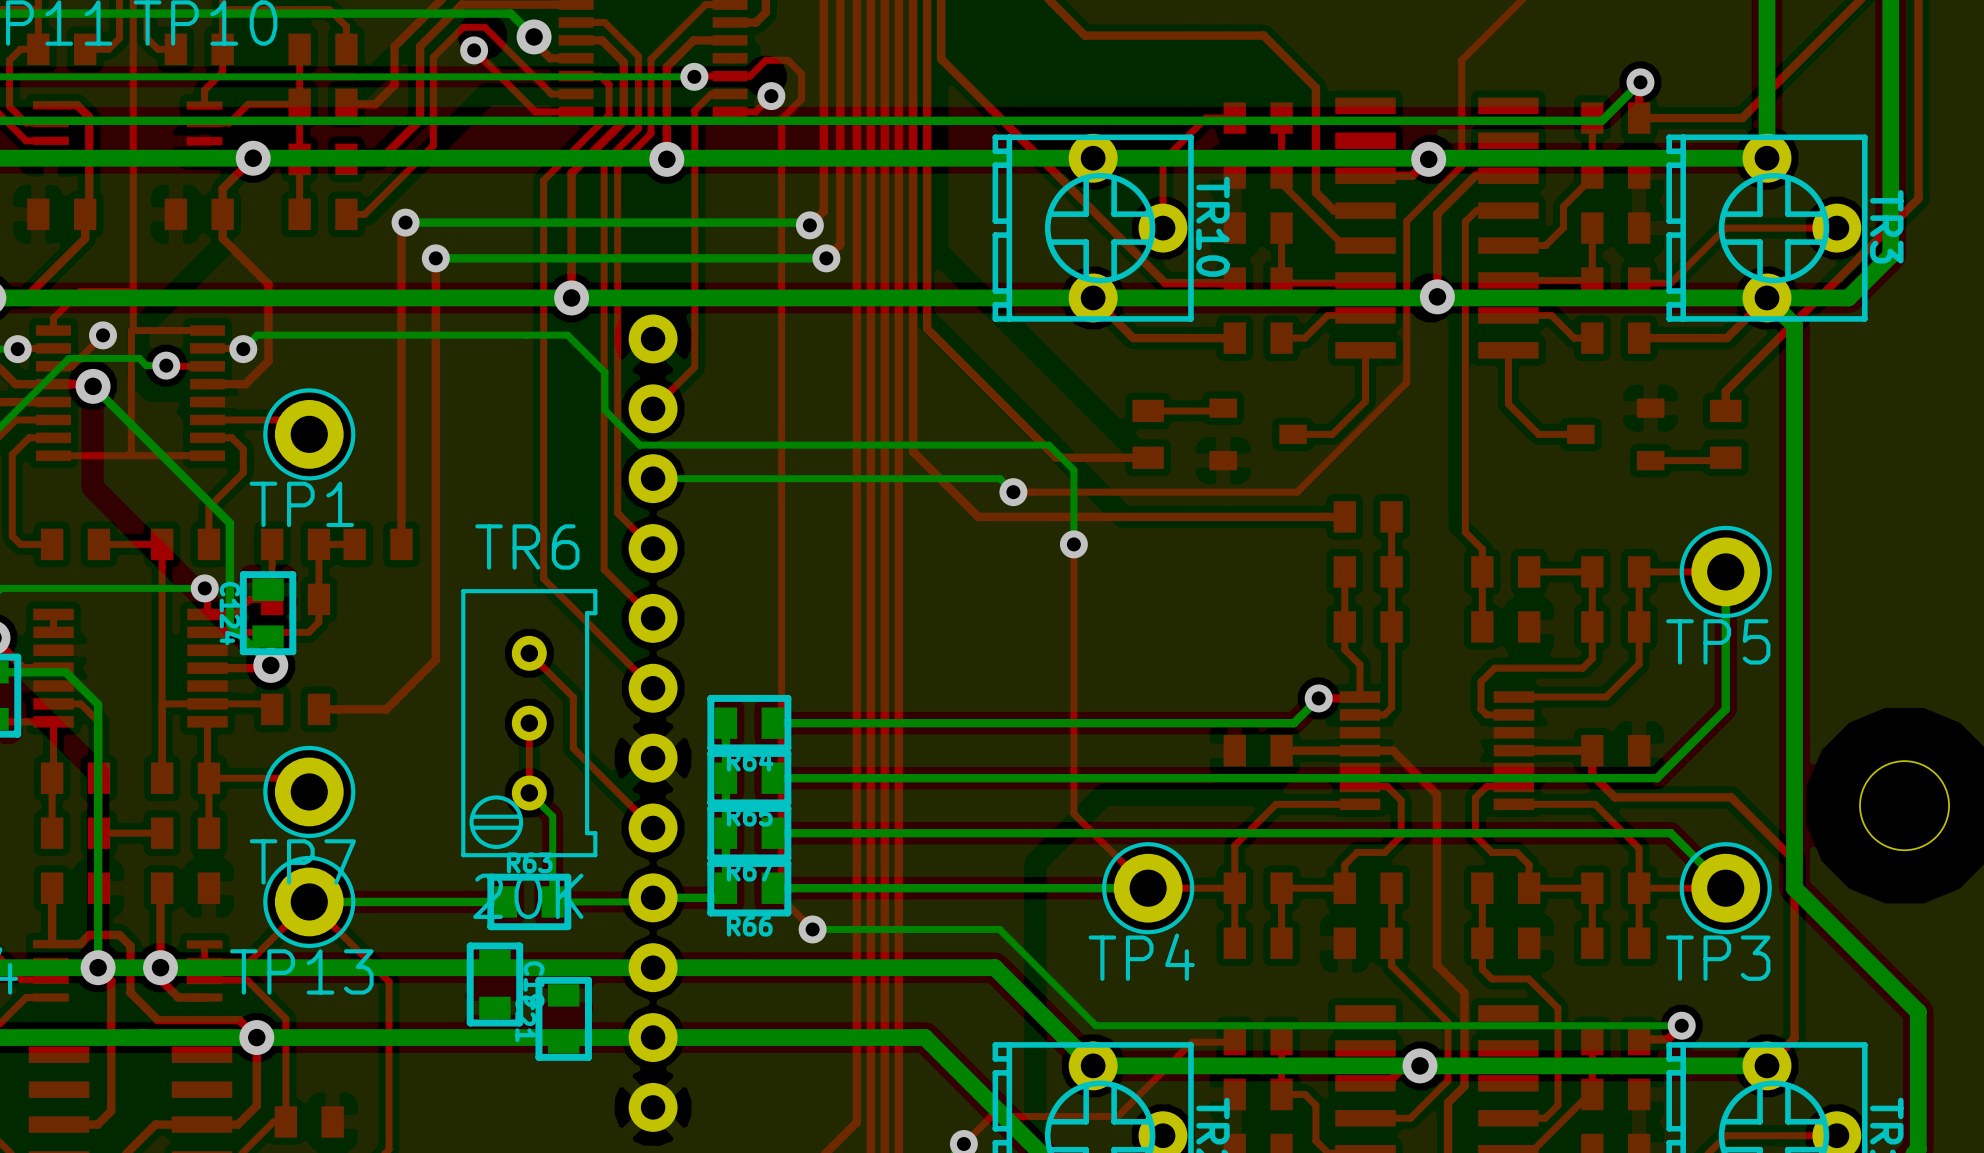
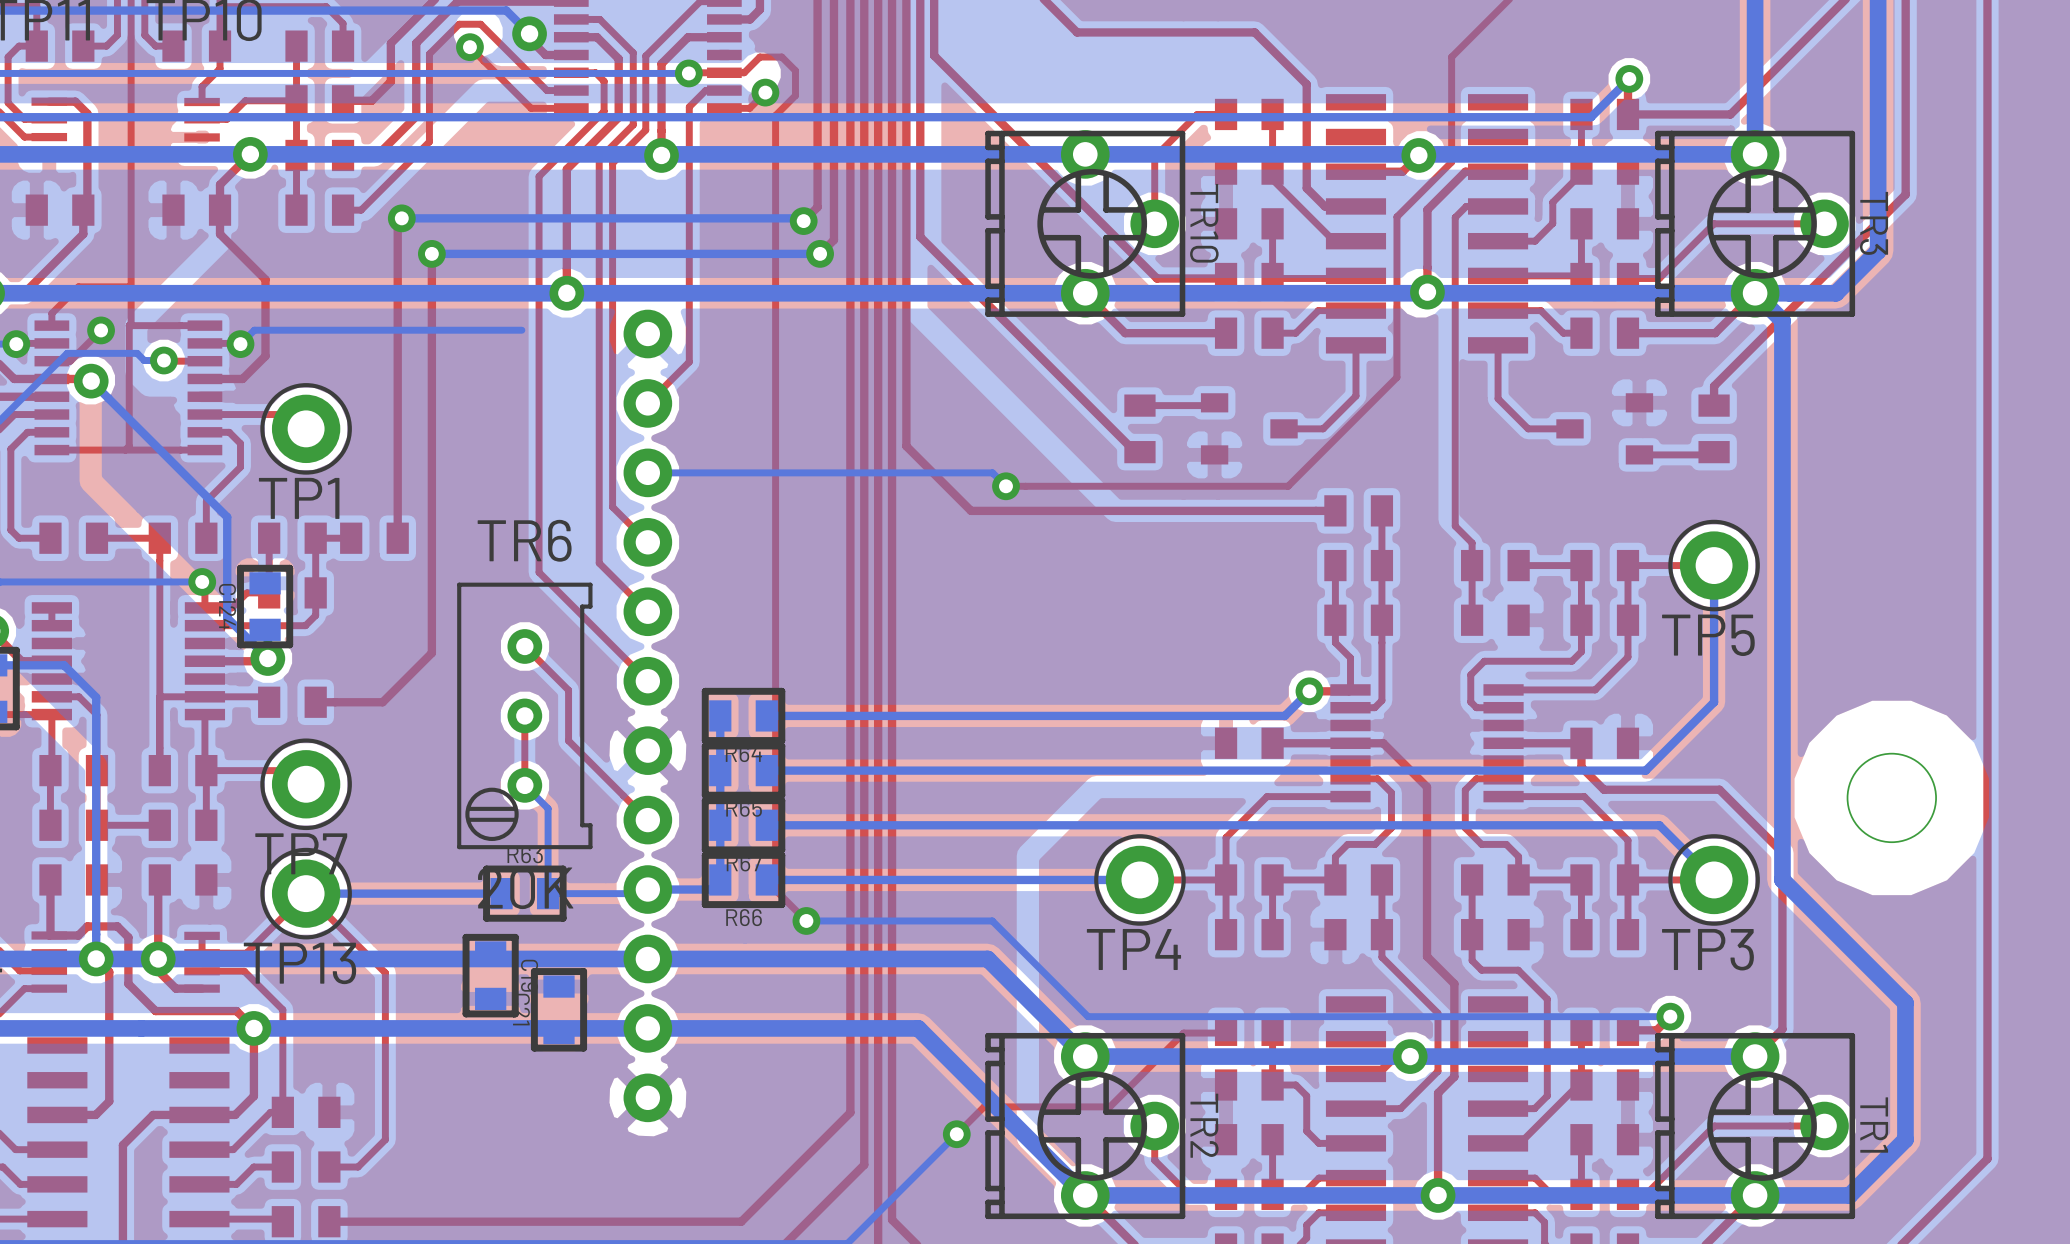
top track: (927, 241) (927, 328) (1056, 457) (1143, 457) -> (920, 236) (1135, 452)
bottom track: (526, 335) (567, 335) (604, 372) (604, 410) (639, 445) (1048, 445) (1073, 470) (1073, 544) -> none
top track: (1073, 544) (1073, 813) (1148, 888) -> none
via: (1073, 544) -> none

